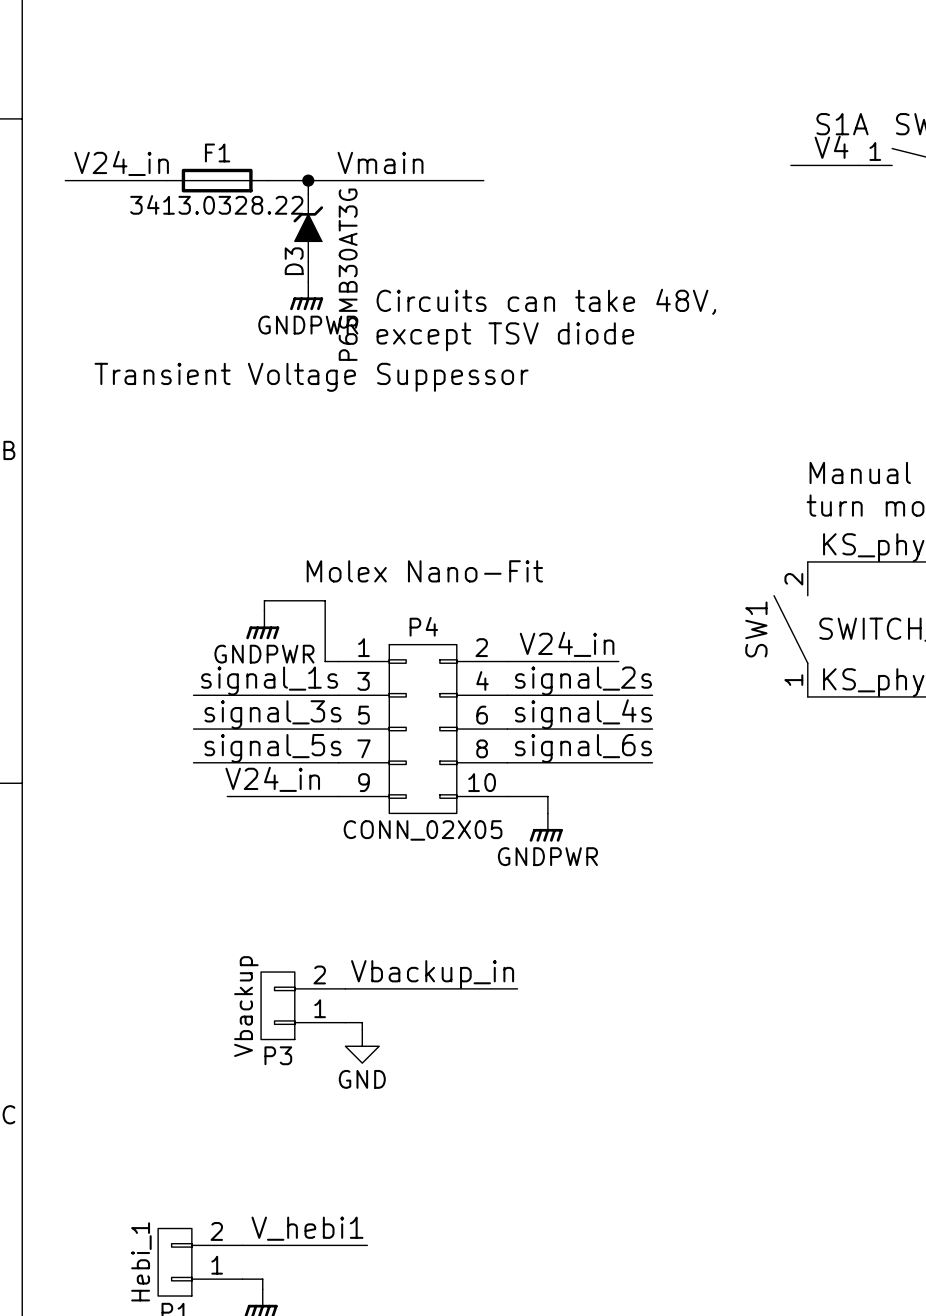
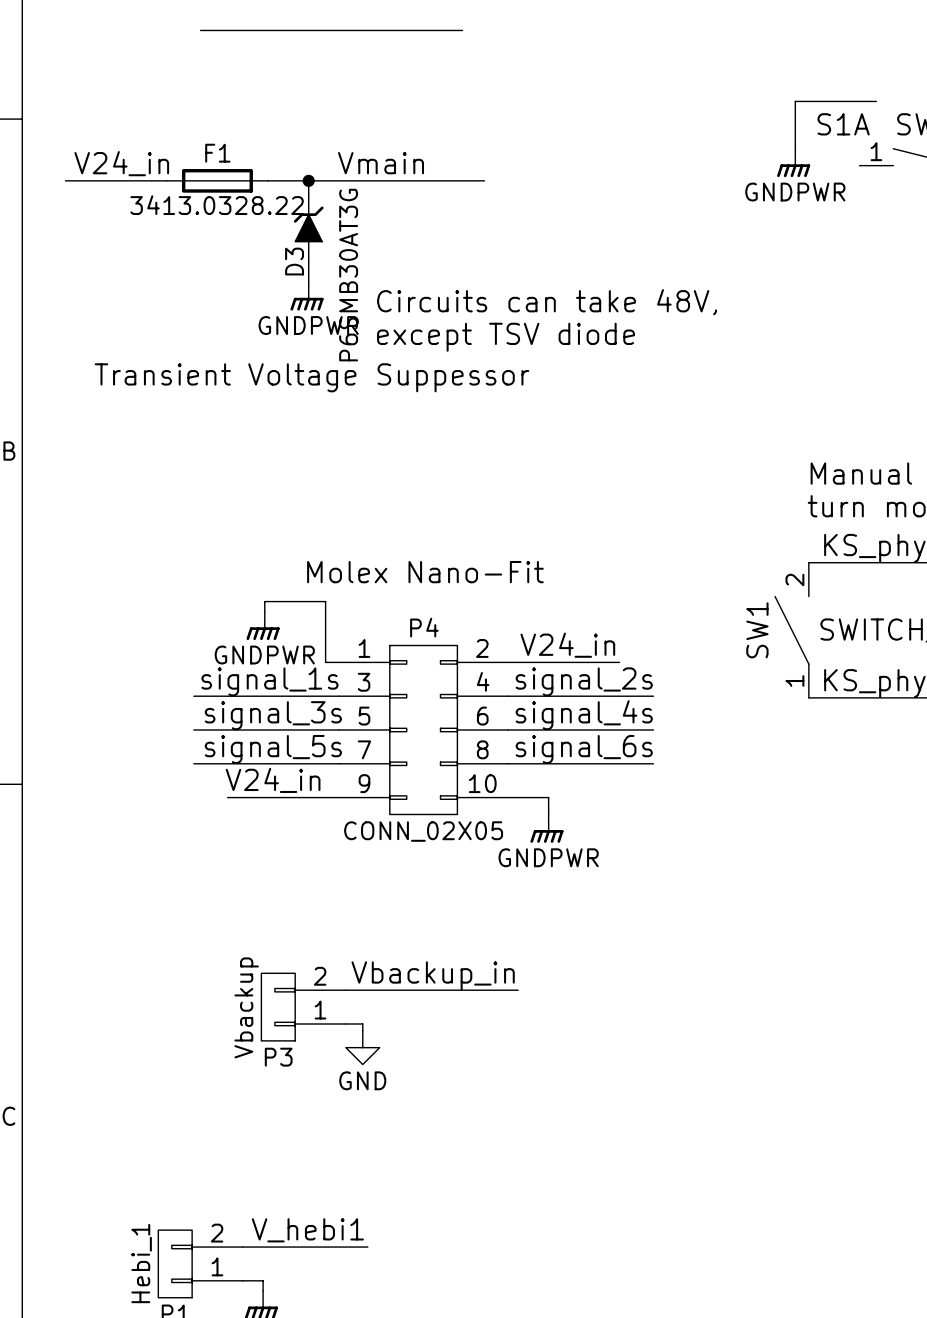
wire: none -> (200, 30) (462, 30)
wire: none -> (876, 101) (795, 101) (795, 148)
label: V4 (831, 147) -> none
power symbol: none -> GNDPWR (793, 162)
wire: (790, 165) (858, 165) -> none

